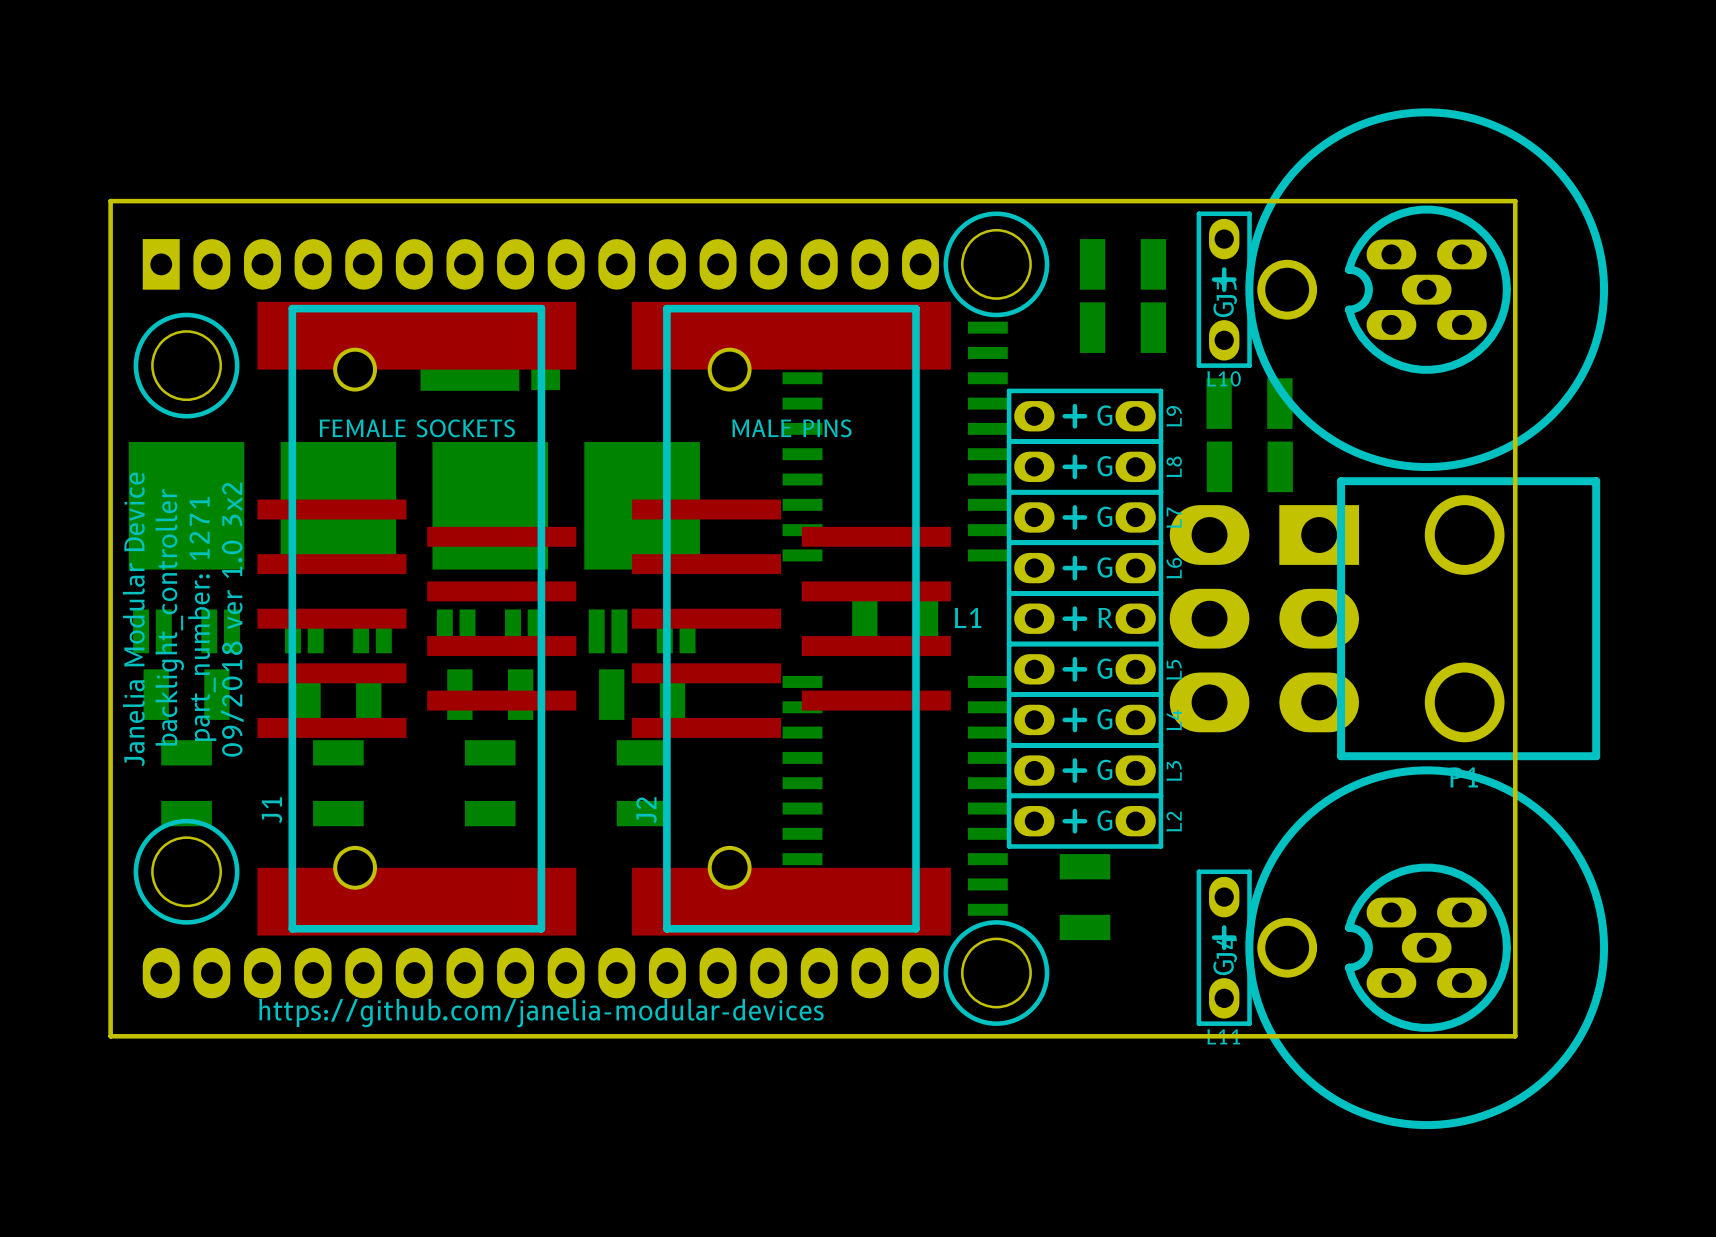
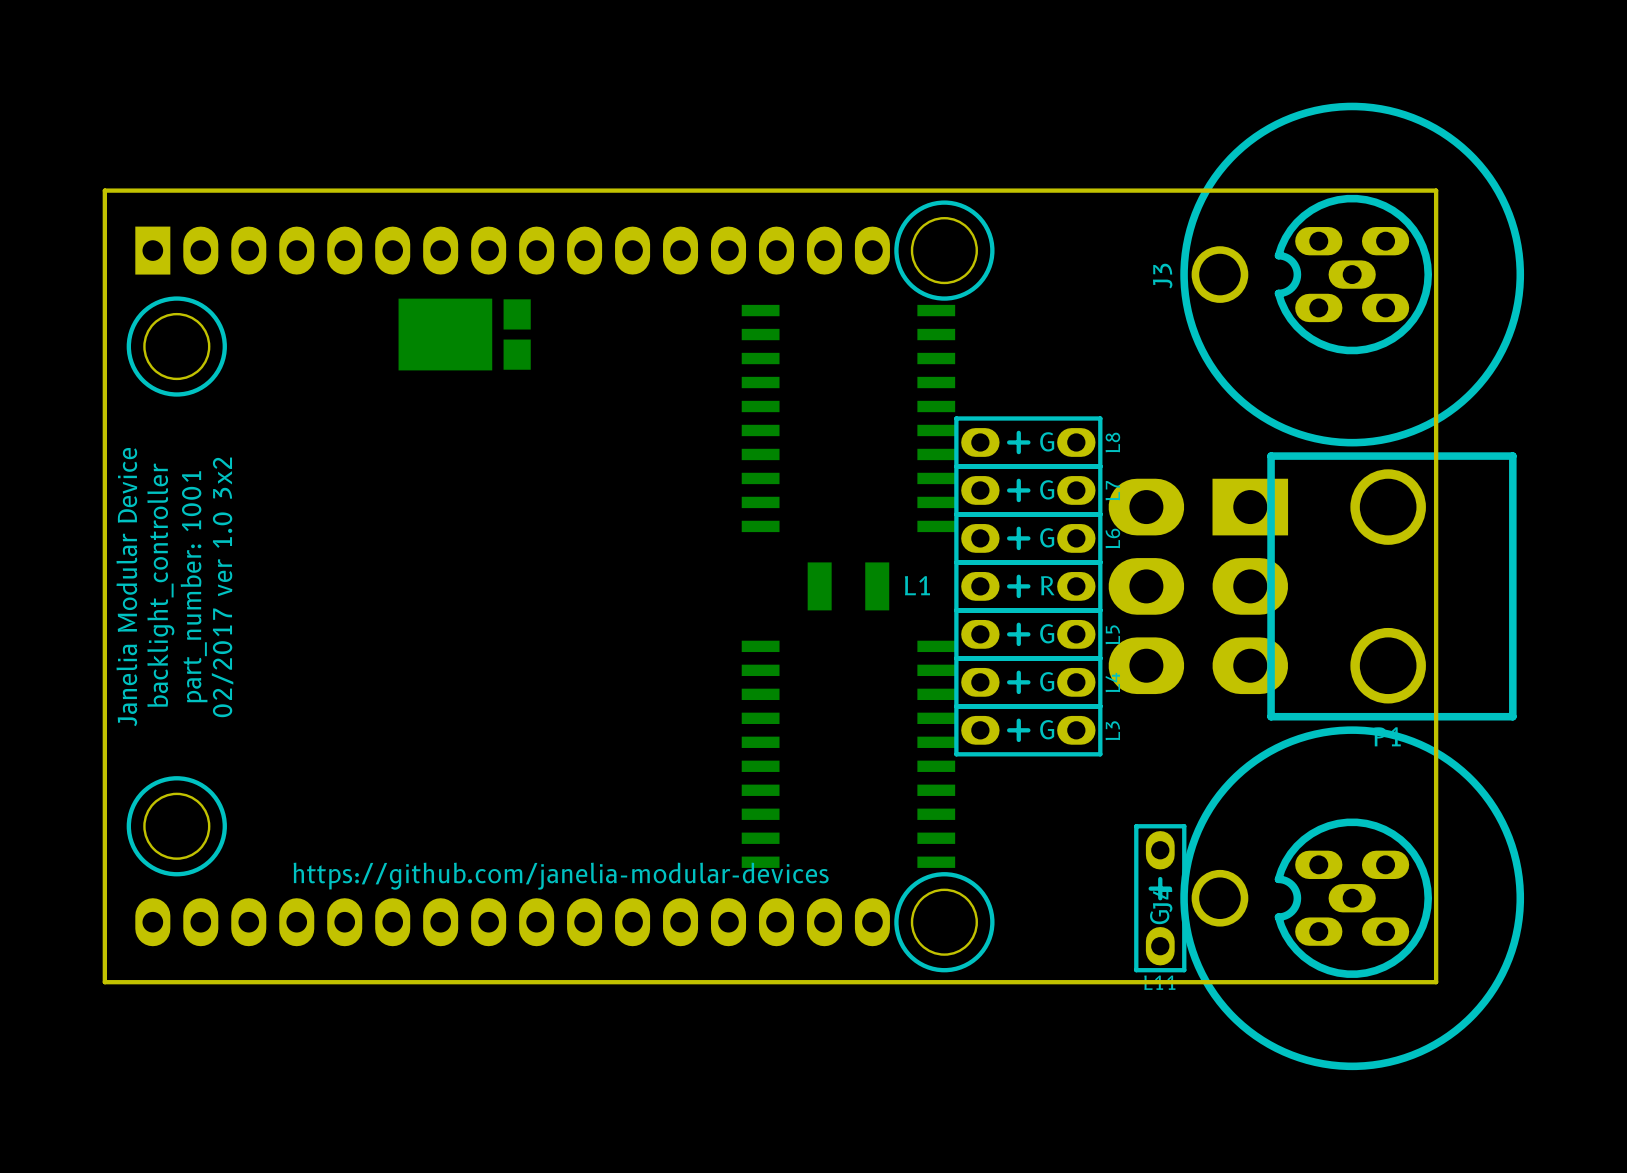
part: (1122, 264) -> none
L10: (1224, 289) -> none
part: (1122, 327) -> none
part: (1249, 403) -> none
L9: (1085, 416) -> none
part: (1249, 466) -> none
part: (186, 547) -> none
part: (338, 547) -> none
part: (490, 547) -> none
part: (642, 547) -> none
J1: (416, 618) -> none
J2: (791, 618) -> none
text: part_number: 1271 (202, 619) -> part_number: 1001 (194, 586)
text: 09/2018 ver 1.0 3x2 (232, 619) -> 02/2017 ver 1.0 3x2 (222, 587)
part: (186, 694) -> none
part: (338, 694) -> none
part: (490, 694) -> none
part: (642, 694) -> none
part: (186, 783) -> none
part: (338, 783) -> none
part: (490, 783) -> none
part: (642, 783) -> none
L2: (1085, 821) -> none
part: (1085, 897) -> none
text position: https://github.com/janelia-modular-devices (541, 1013) -> https://github.com/janelia-modular-devices (561, 876)

